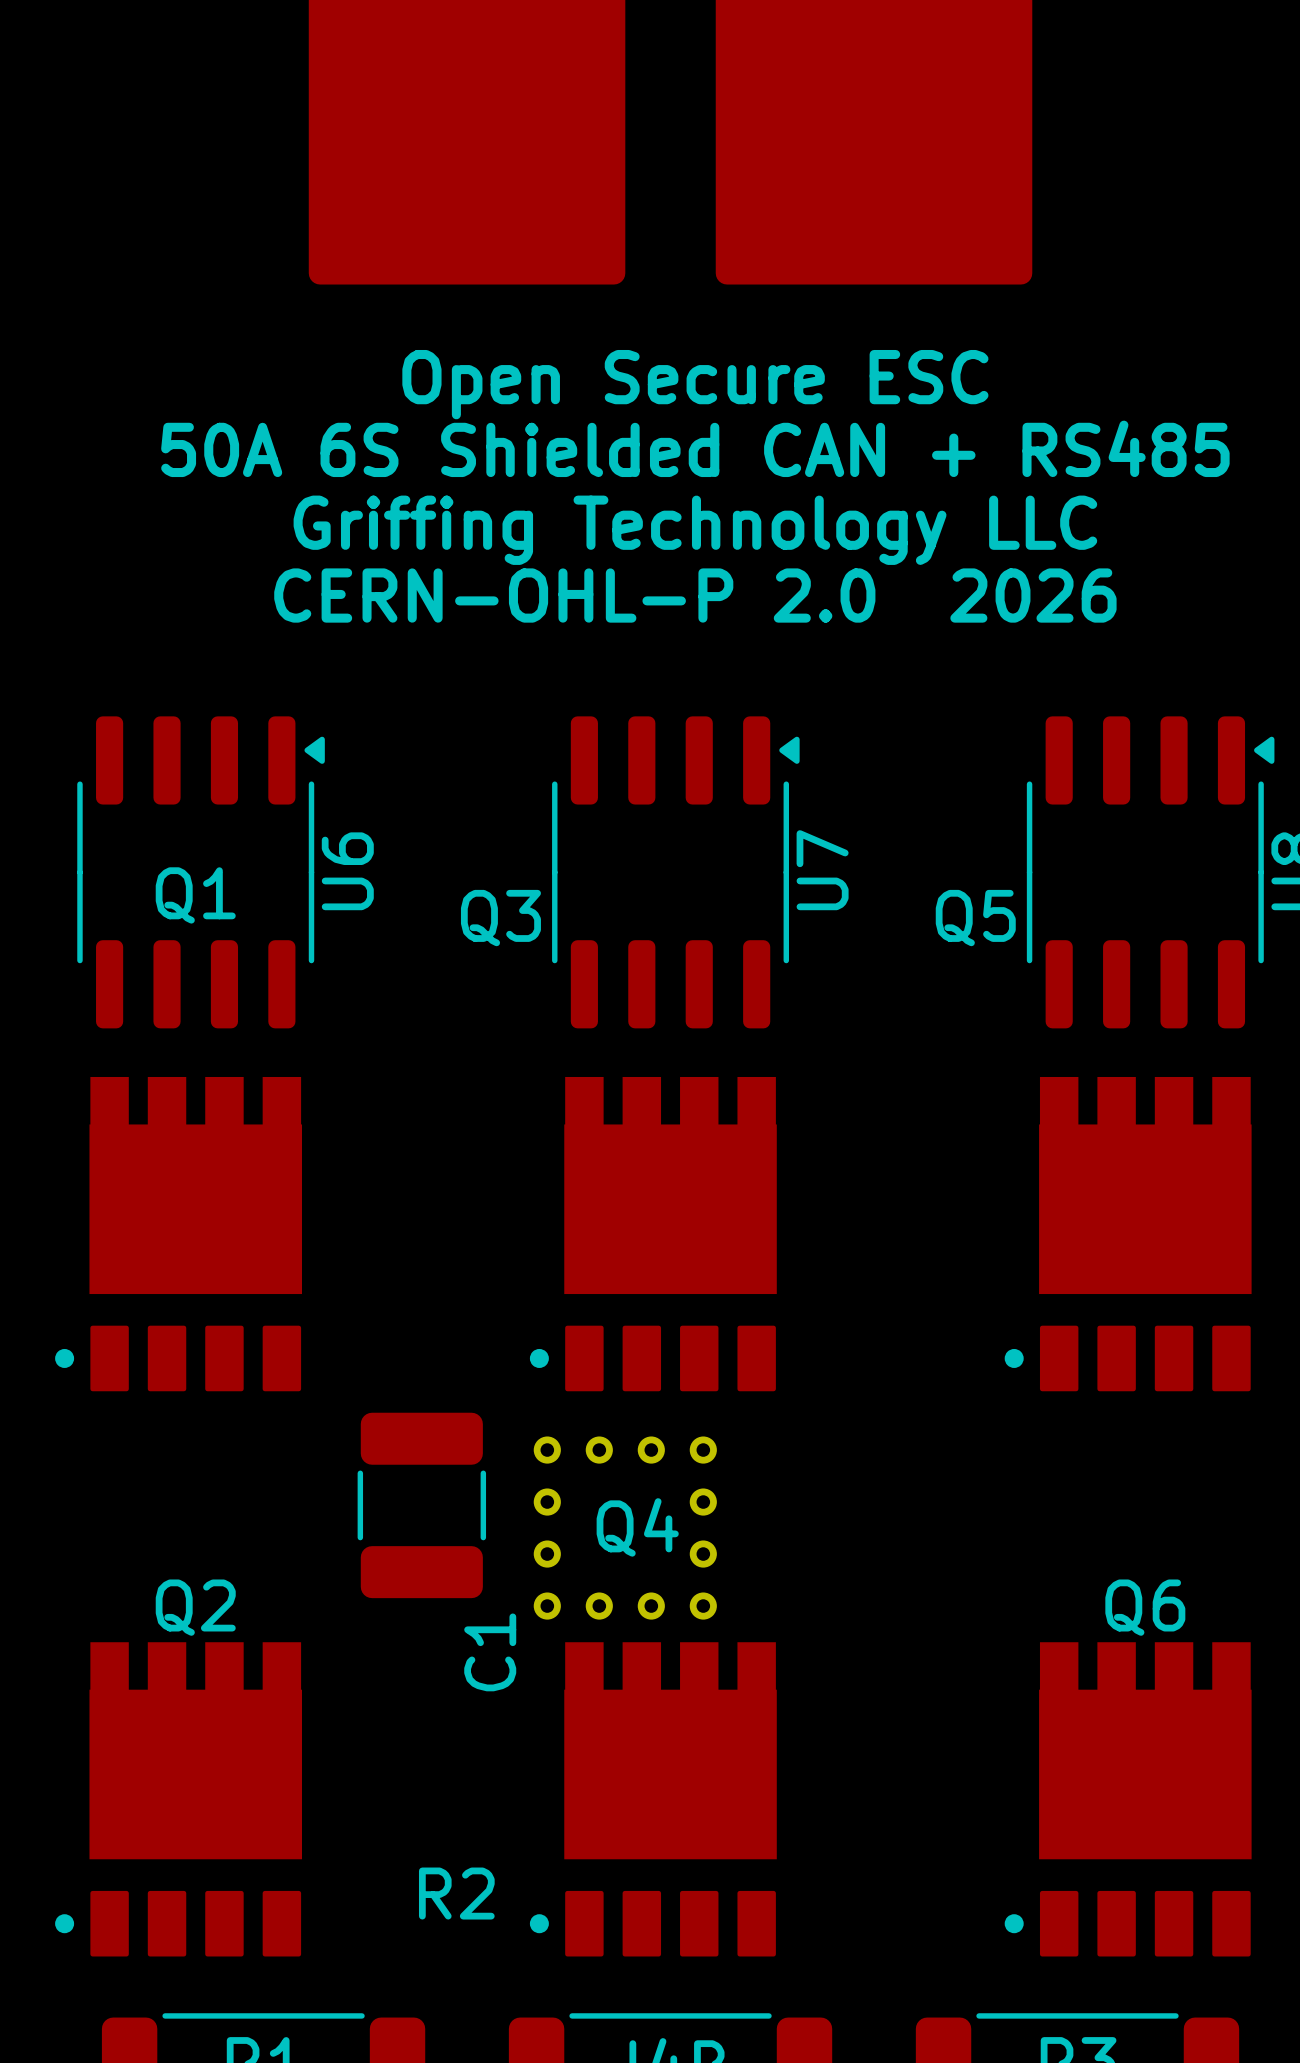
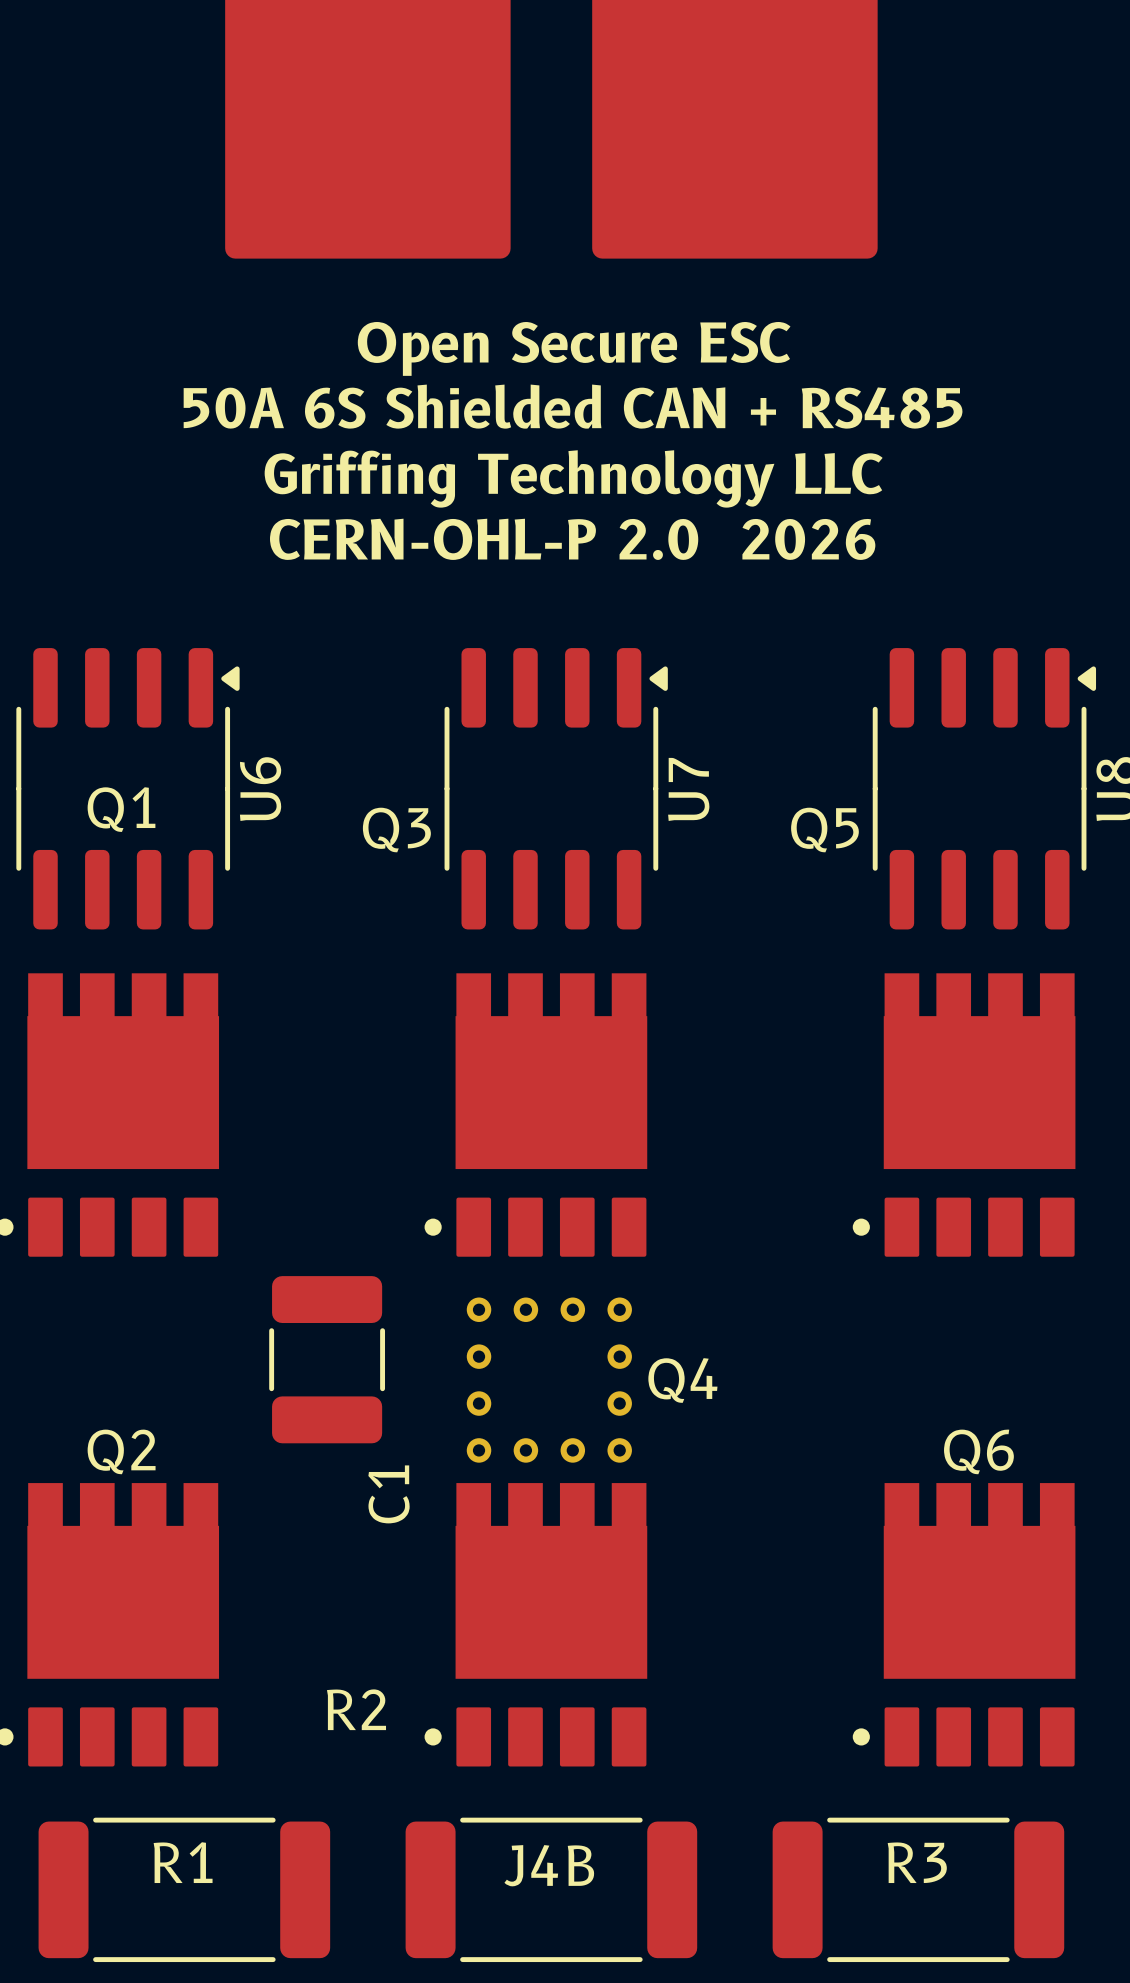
Q4 name position: Q4 (637, 1527) -> Q4 (682, 1380)
part position: (625, 1528) -> (549, 1380)

